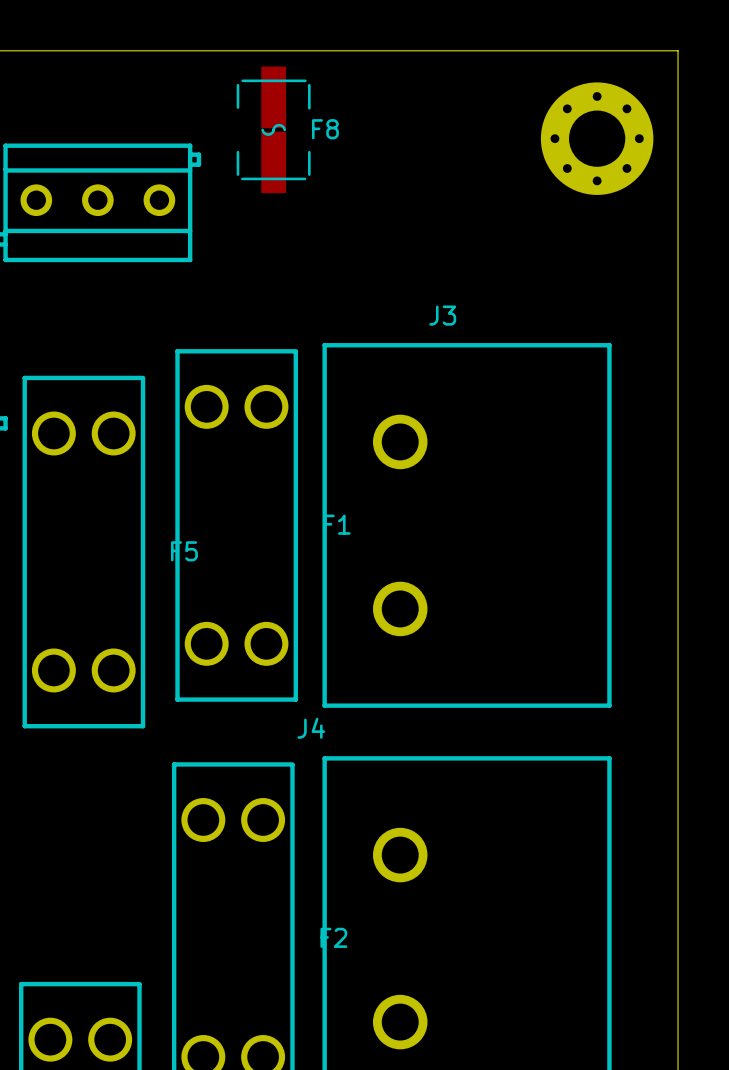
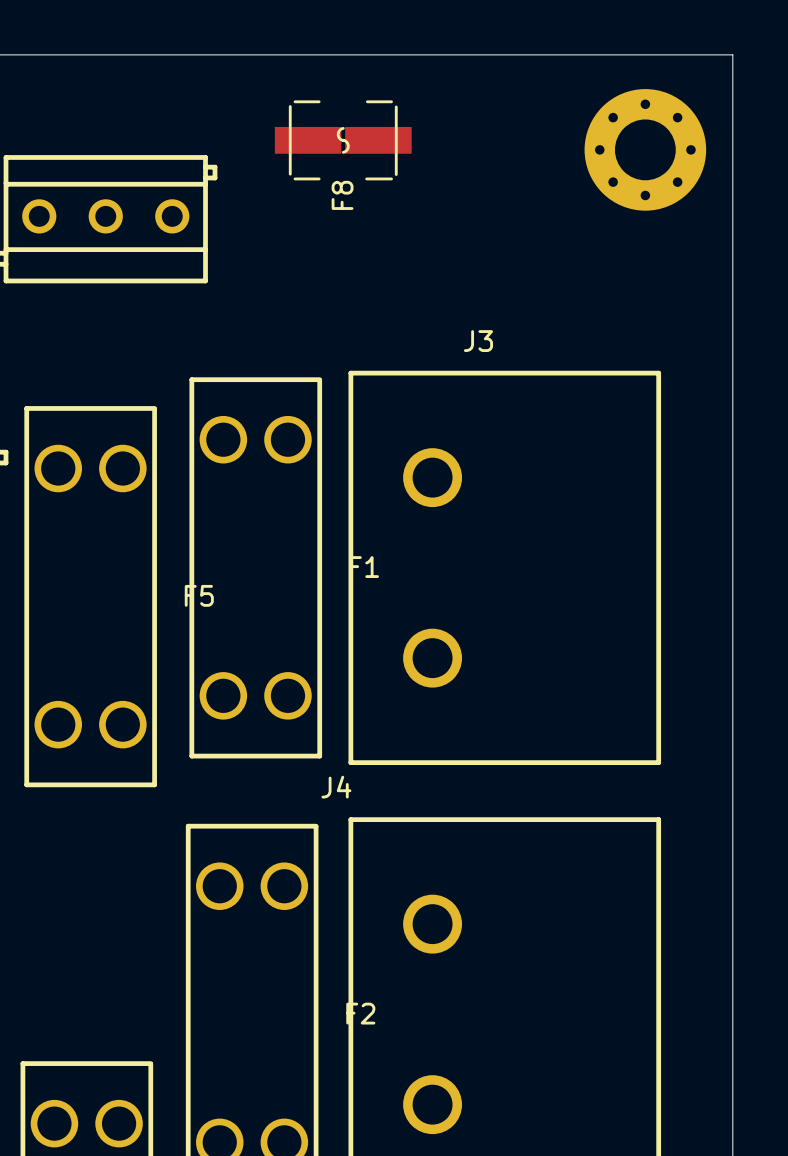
F8 rotation: 0° (273, 129) -> 90° clockwise (343, 140)

